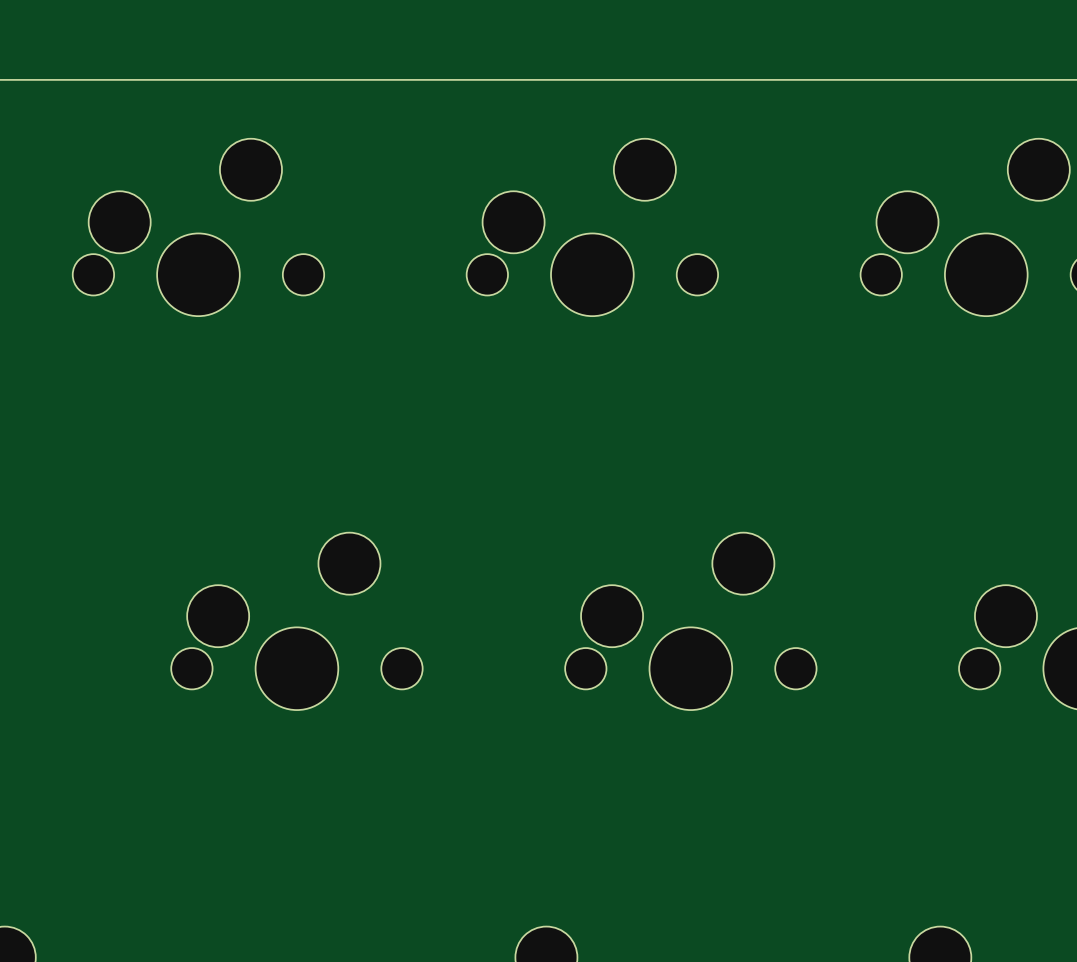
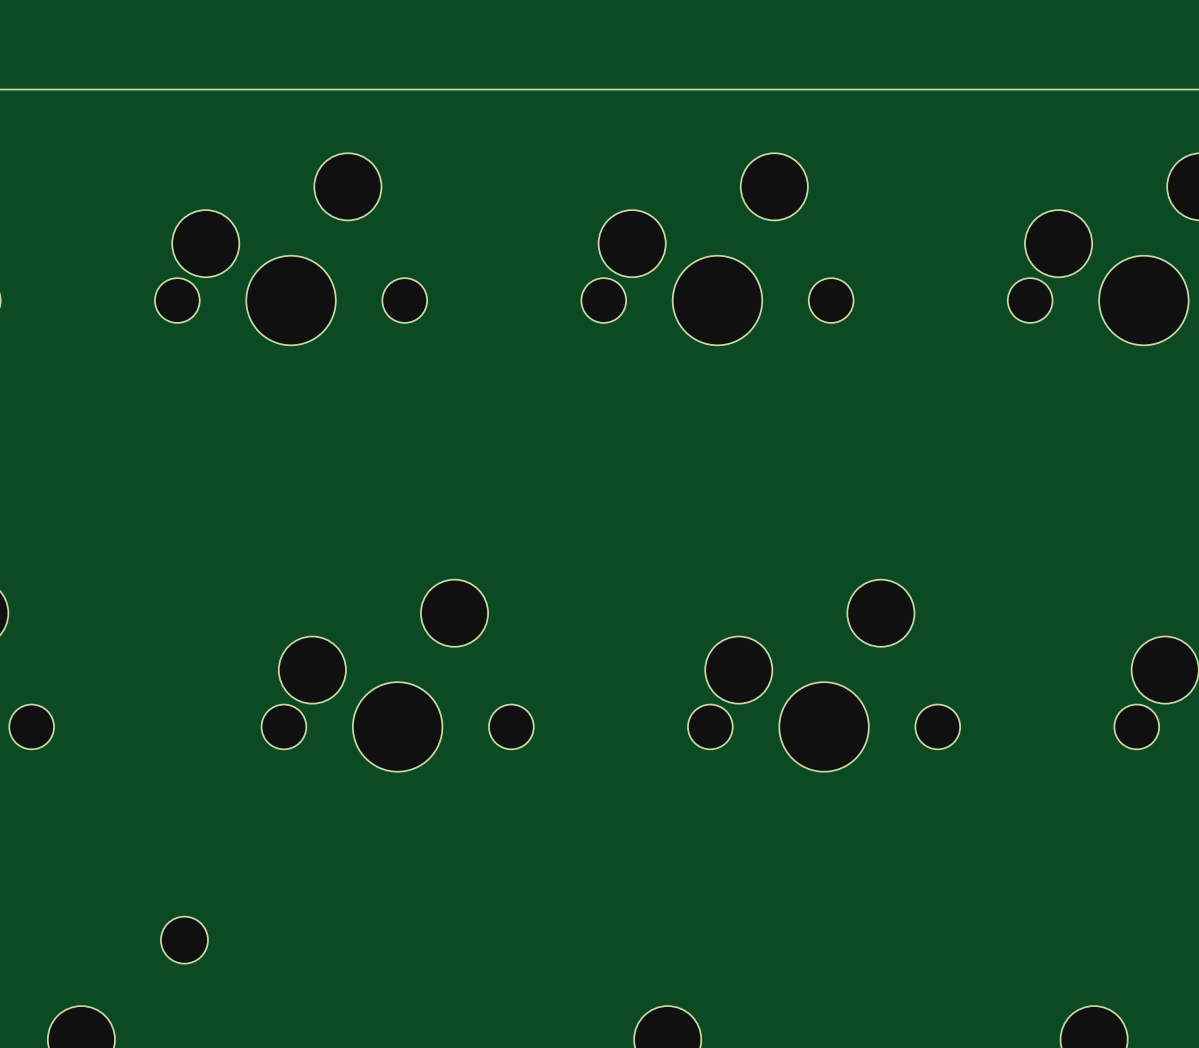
part: none -> (184, 940)

